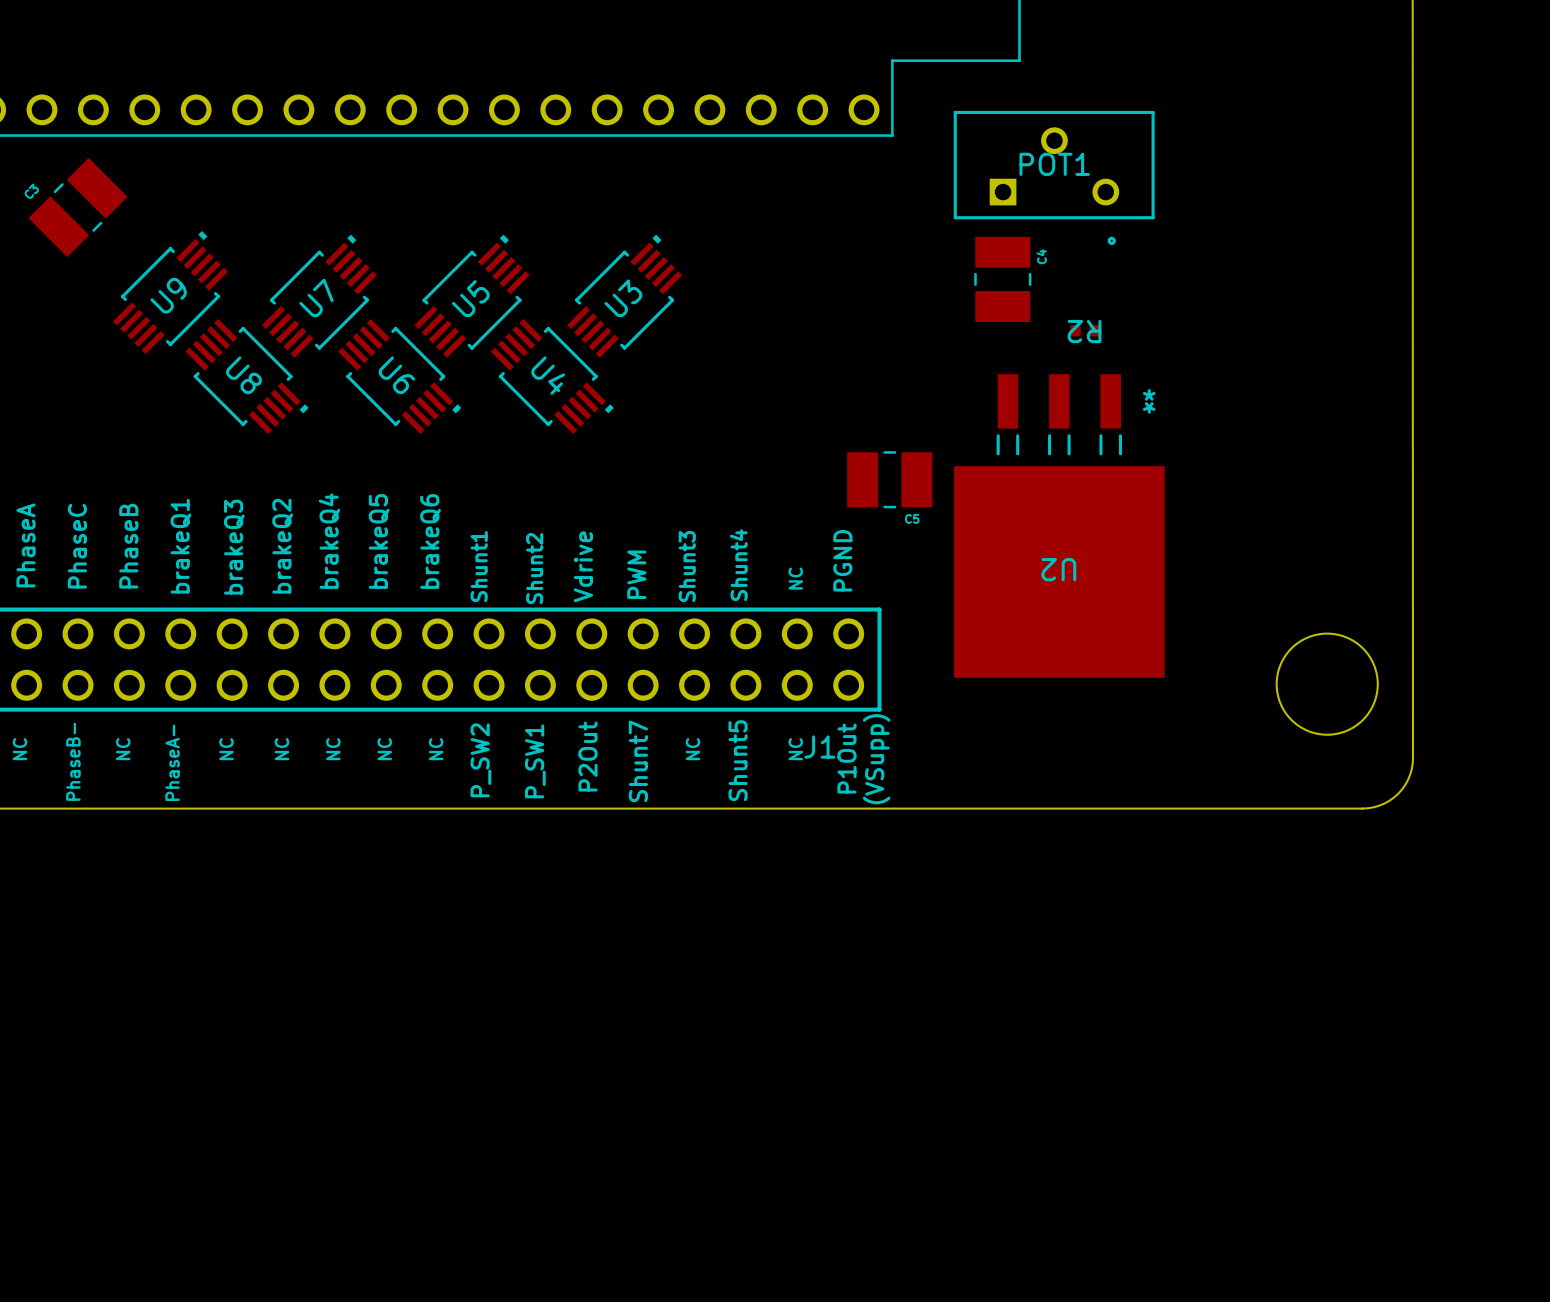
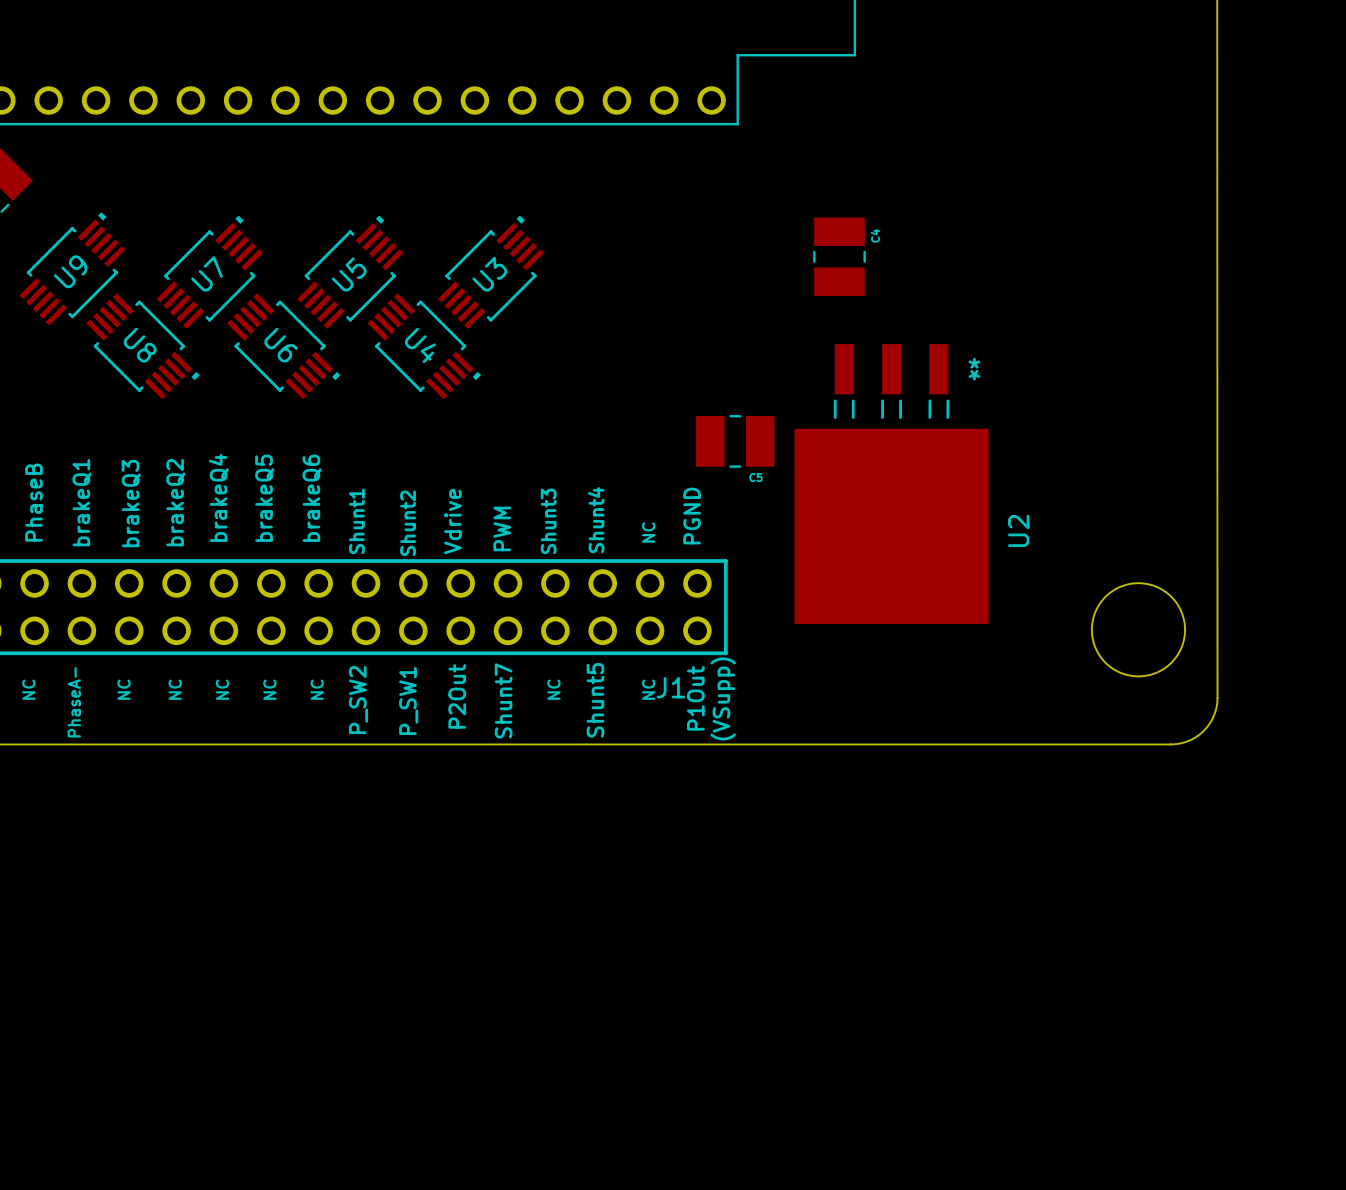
POT1: (1054, 177) -> none
R2: (1085, 330) -> none
U2 name rotation: 0° (1058, 569) -> 90° clockwise (1018, 530)
U2 name position: U2 (1058, 569) -> U2 (1018, 530)

